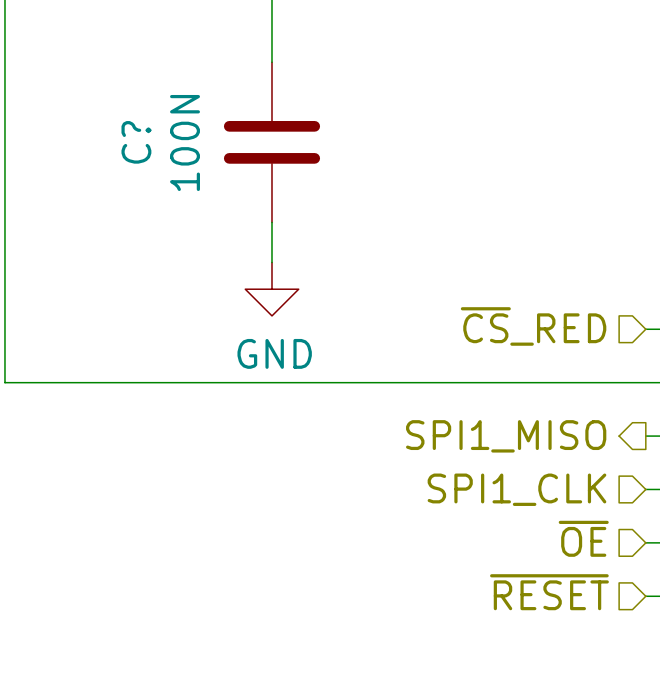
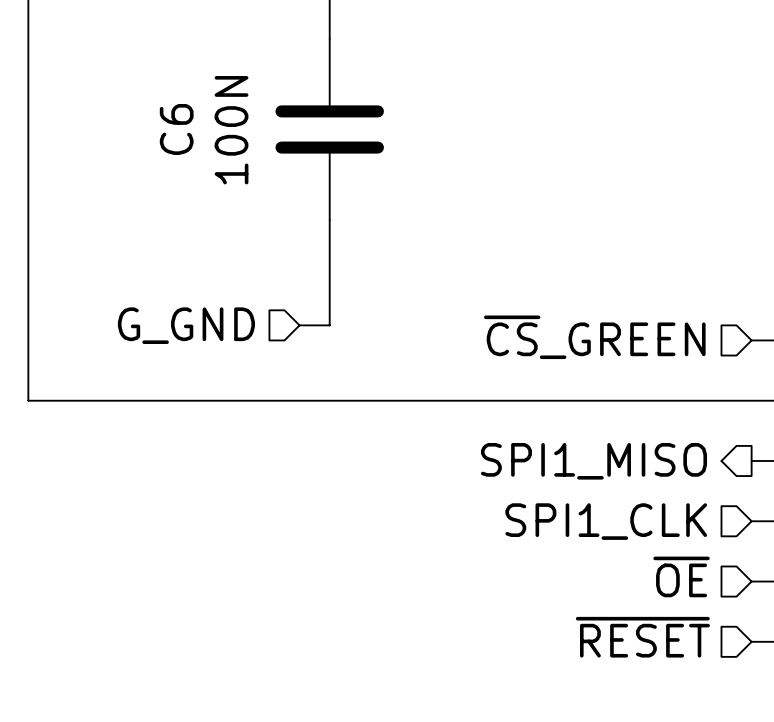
C? name: C? (136, 142) -> C6 (176, 129)
wire: none -> (329, 265) (329, 325) (299, 325)
power symbol: GND (271, 289) -> none
hierarchical label: none -> G_GND (186, 325)
hierarchical label: ~{CS}_RED (533, 326) -> ~{CS}_GREEN (594, 337)

